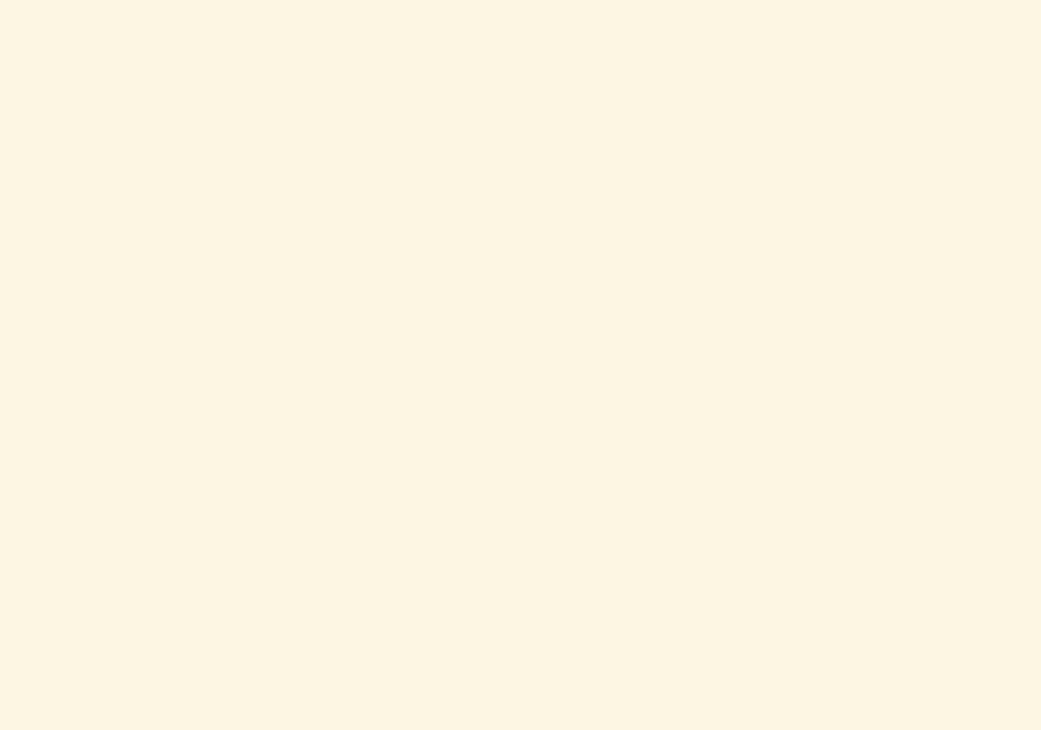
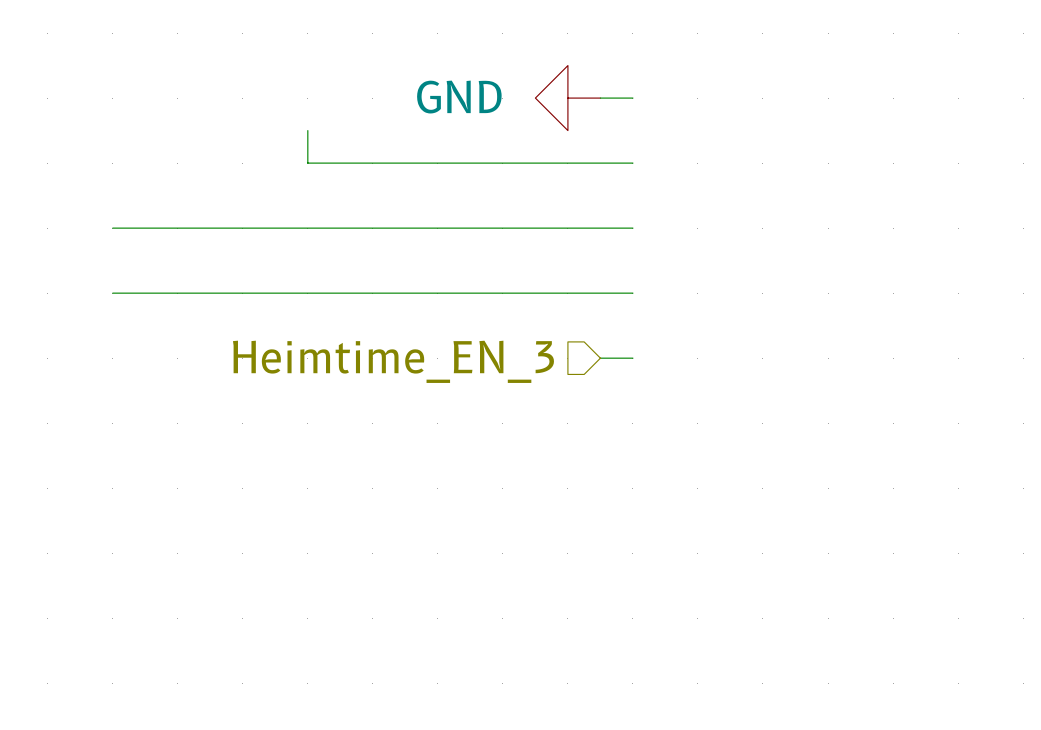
power symbol: none -> GND (567, 98)
wire: none -> (600, 98) (632, 98)
wire: none -> (307, 130) (307, 163) (632, 163)
wire: none -> (112, 228) (632, 228)
wire: none -> (112, 293) (632, 293)
hierarchical label: none -> Heimtime_EN_3 (393, 361)
wire: none -> (600, 358) (632, 358)

